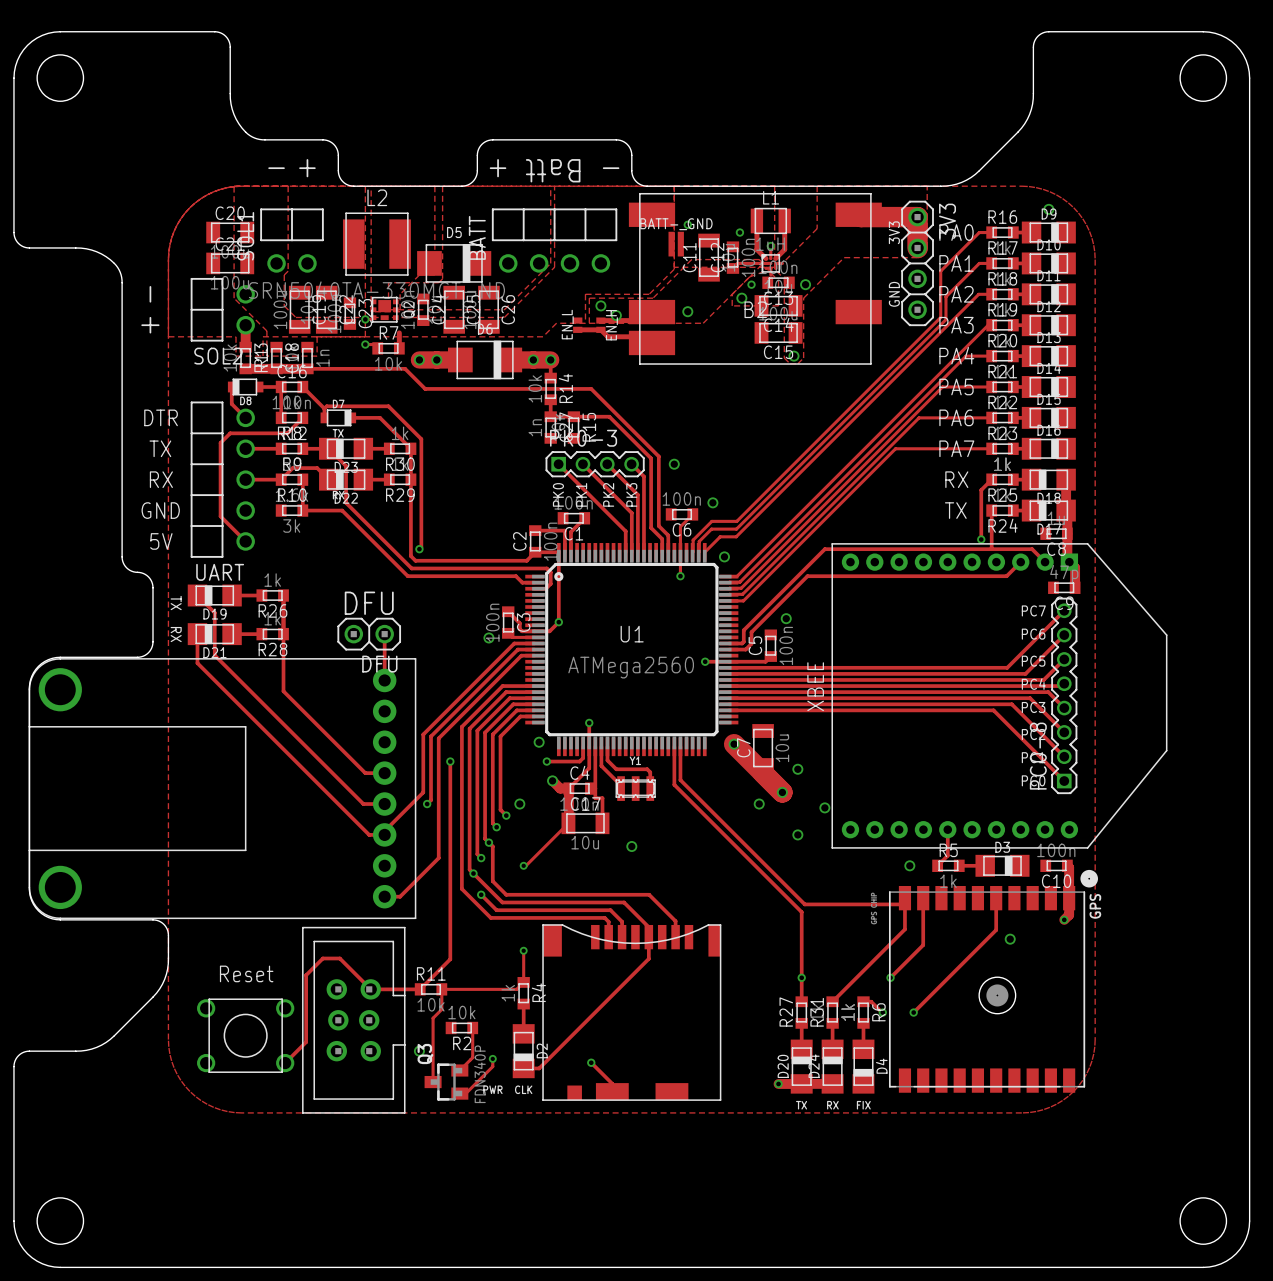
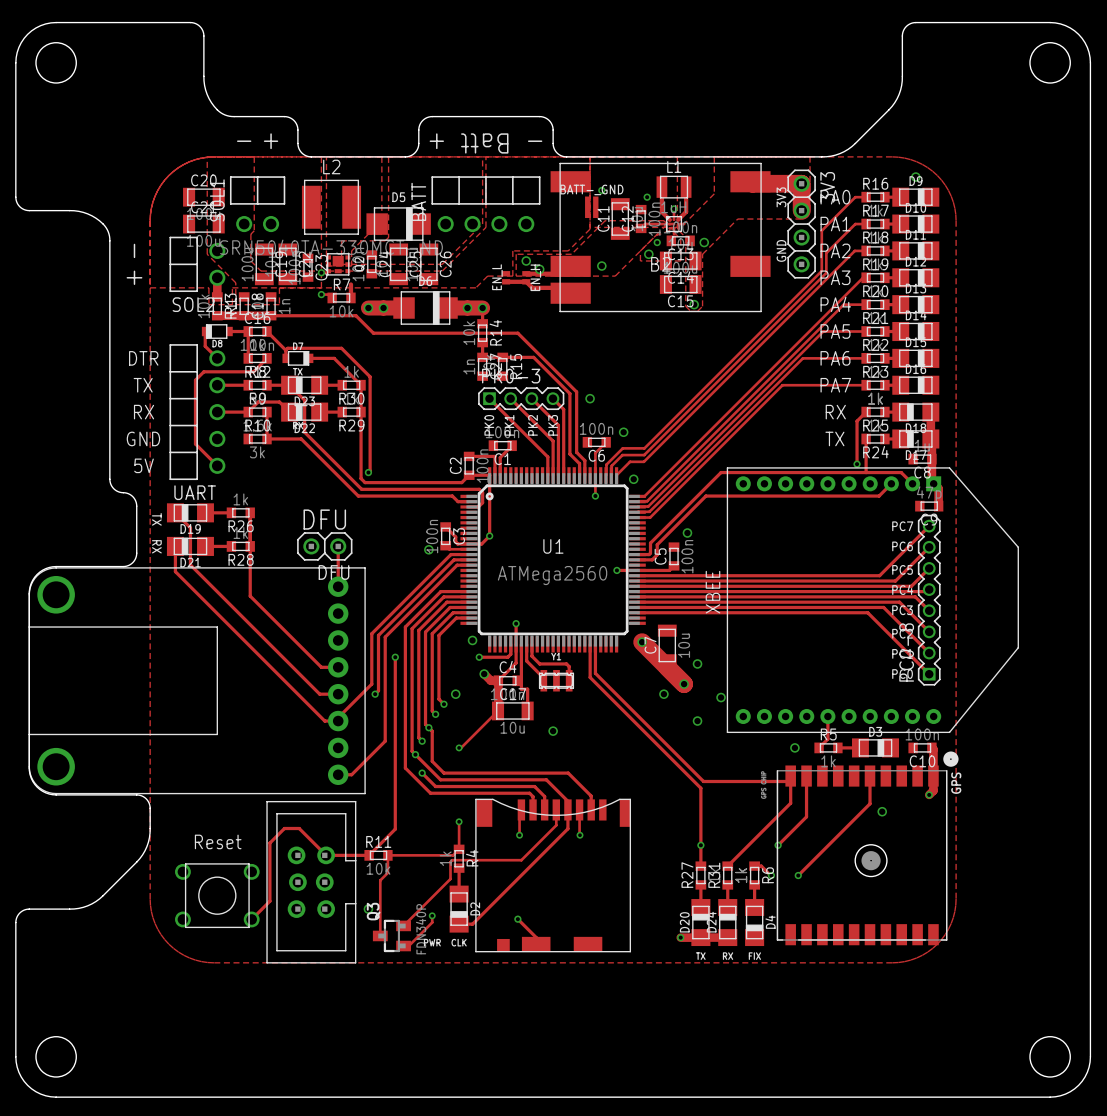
track: none -> (521, 809) (519, 811) (519, 835)
track: none -> (579, 810) (579, 835)
via: none -> (519, 835)
via: none -> (579, 835)
R2: 10k (461, 1027) -> none
track: (472, 1027) (472, 1057) -> (556, 809) (556, 825) (521, 860) (452, 860) (450, 862) (450, 878) (414, 914)

